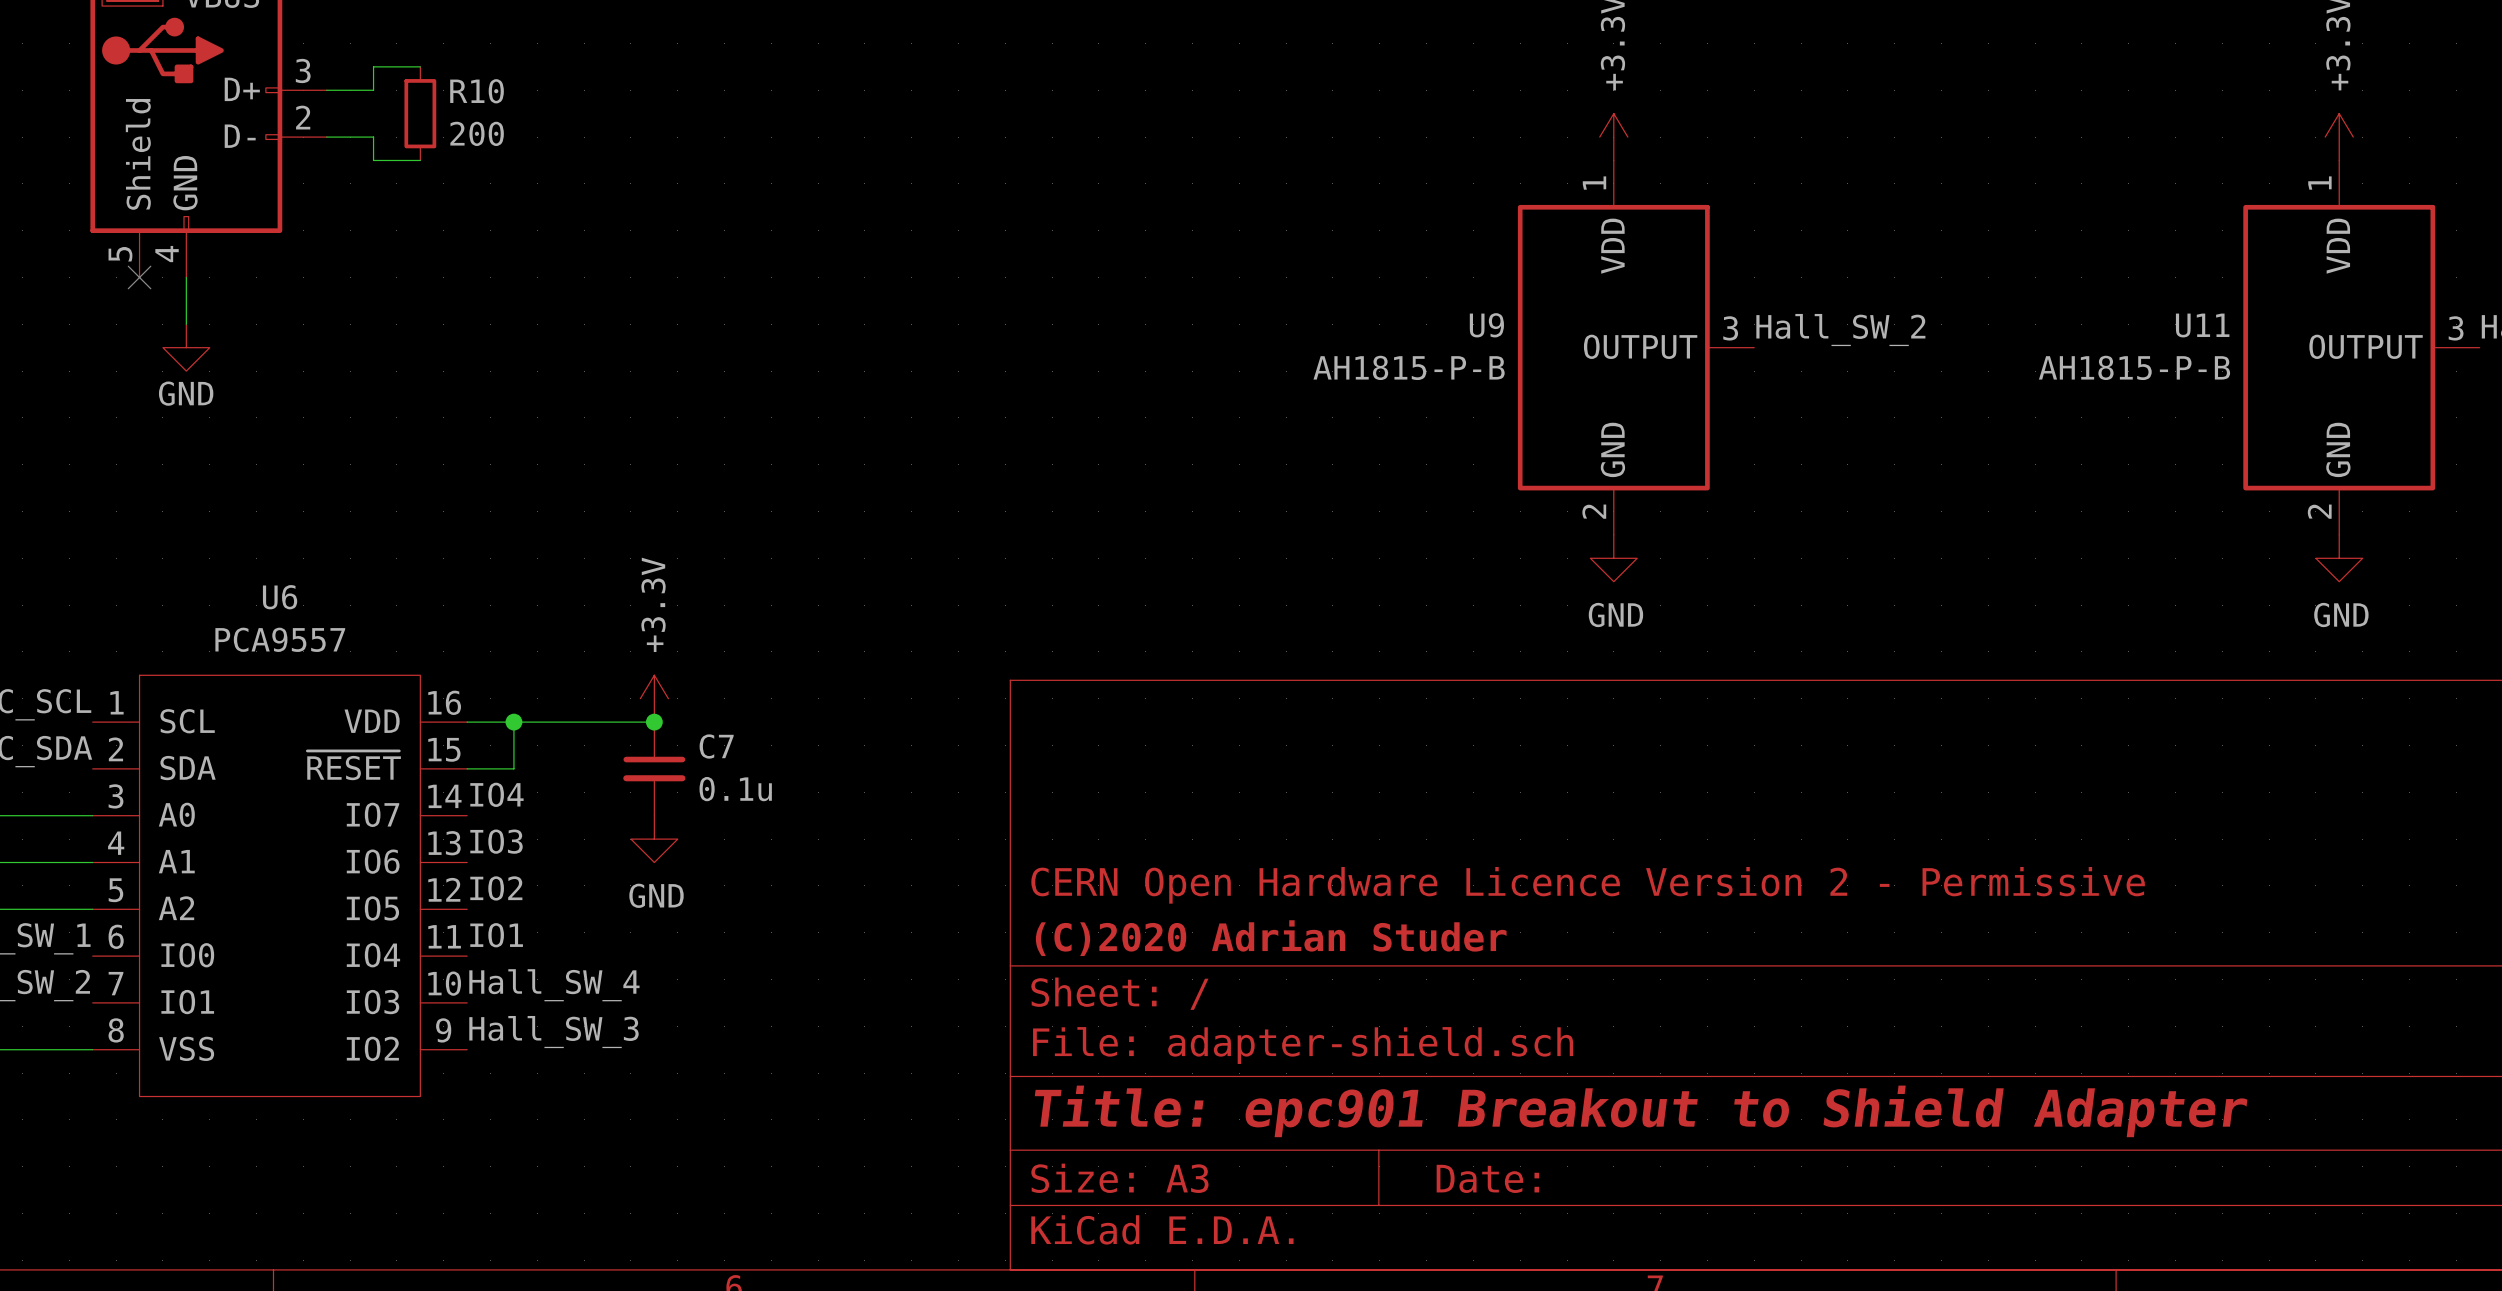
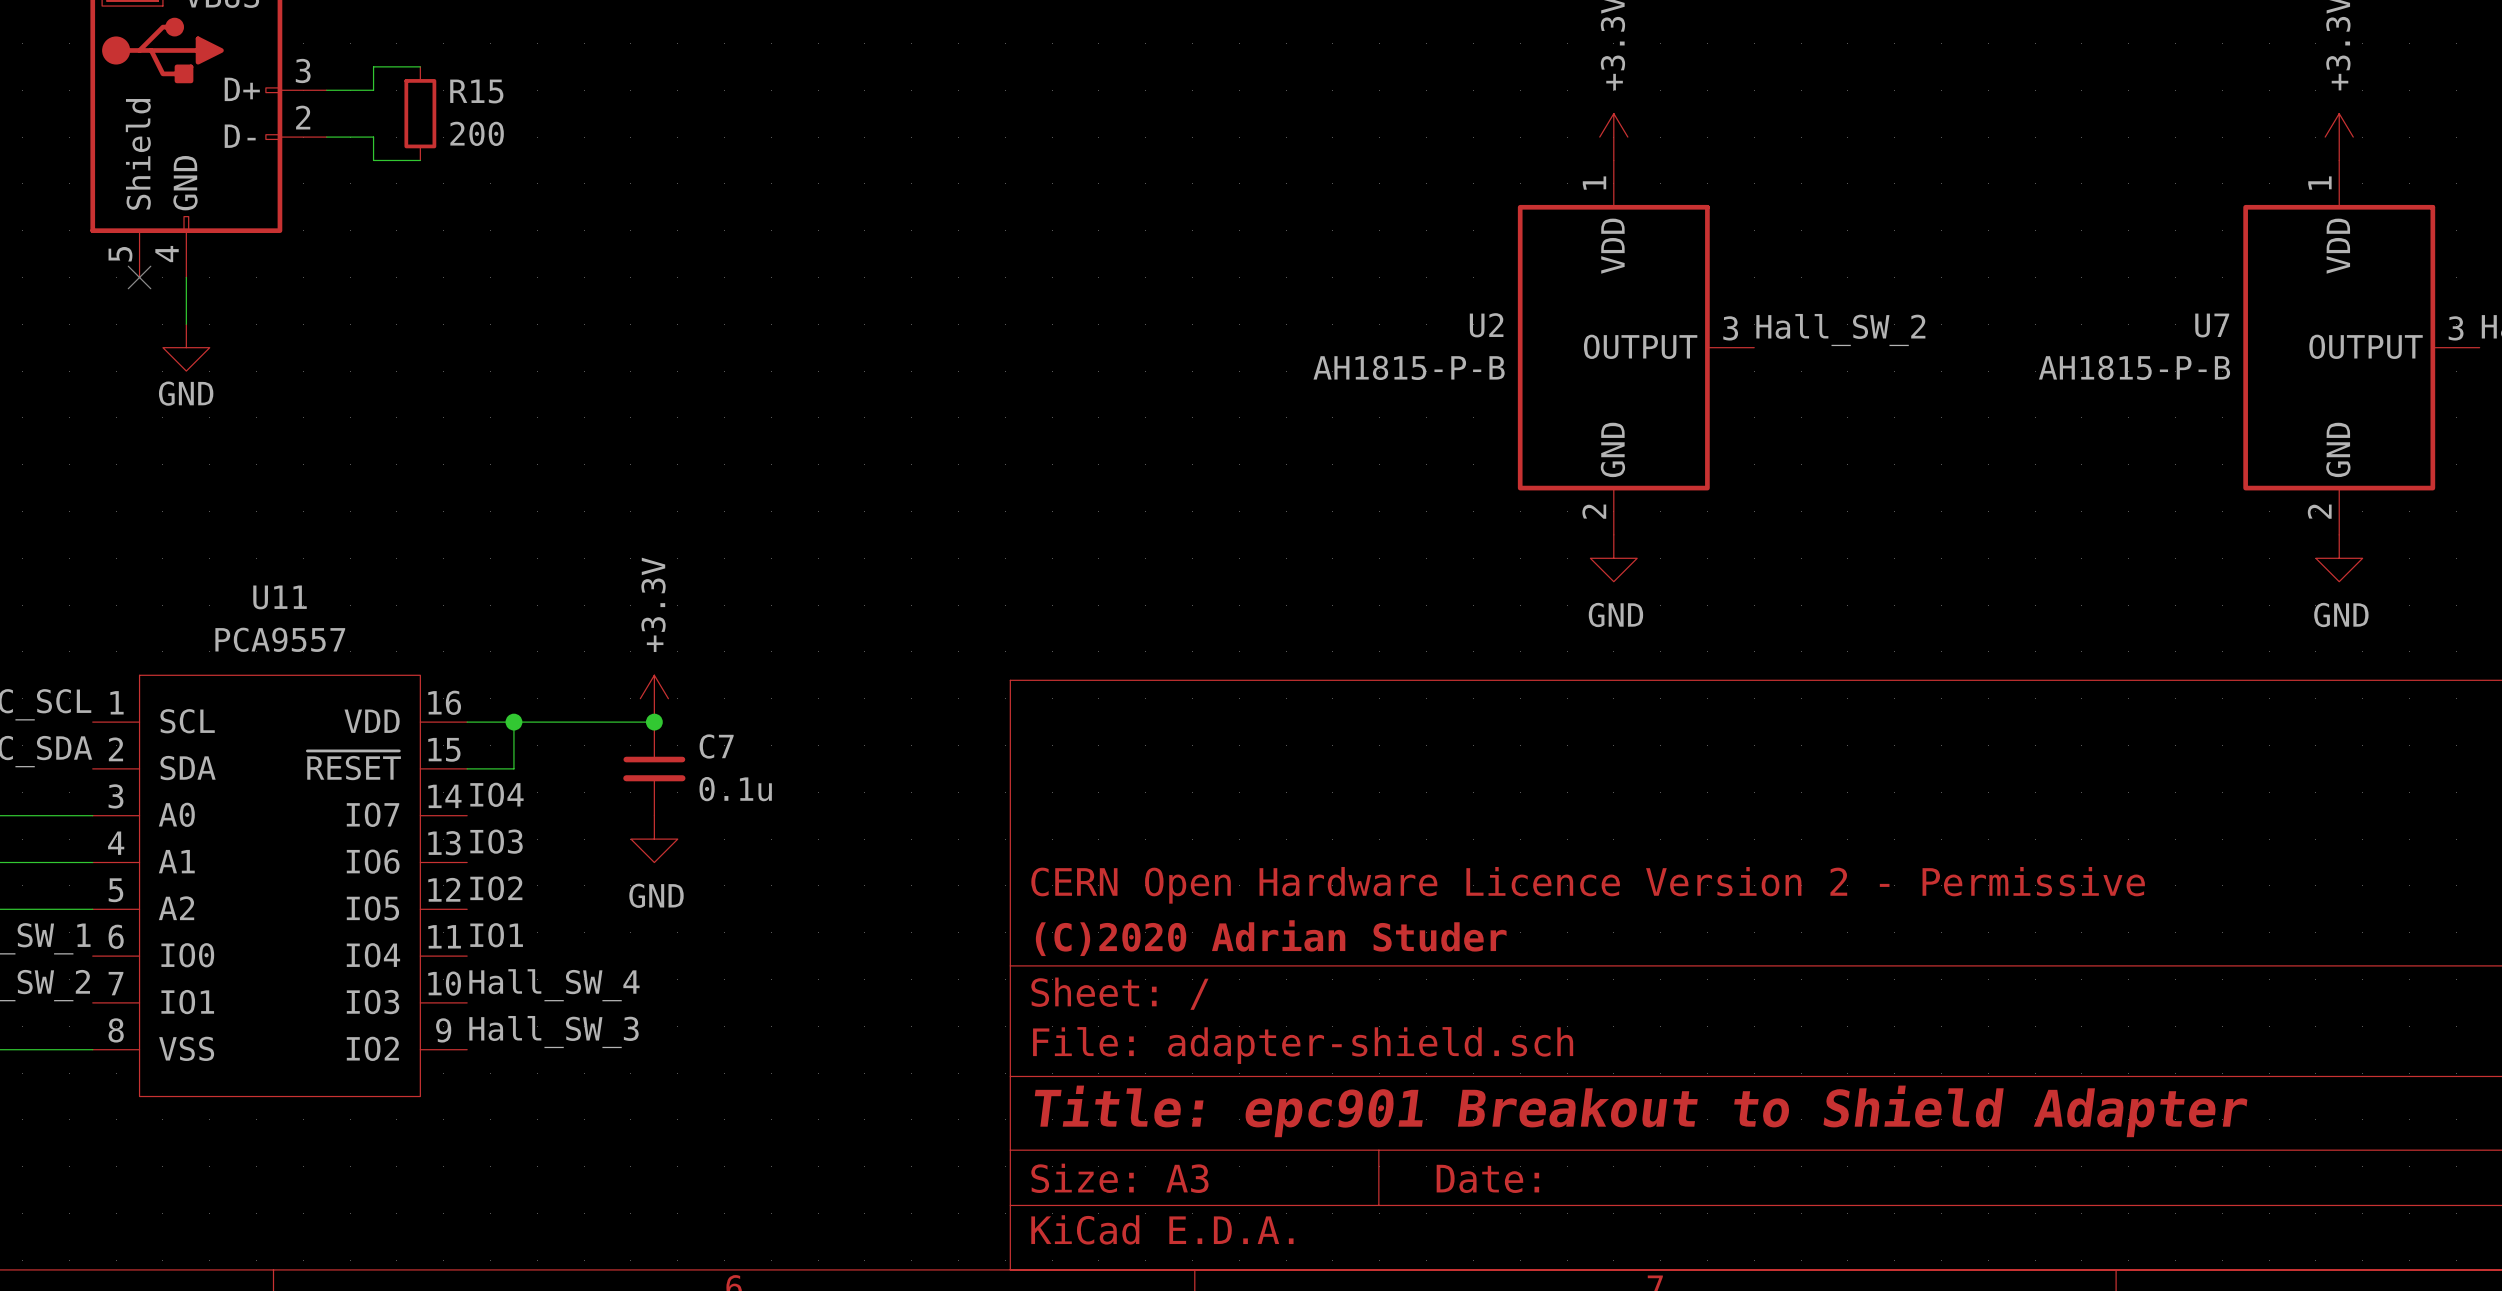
R10 name: R10 (477, 91) -> R15 (476, 91)
U9 name: U9 (1486, 325) -> U2 (1486, 325)
U11 name: U11 (2202, 325) -> U7 (2212, 325)
U6 name: U6 (280, 597) -> U11 (280, 597)

